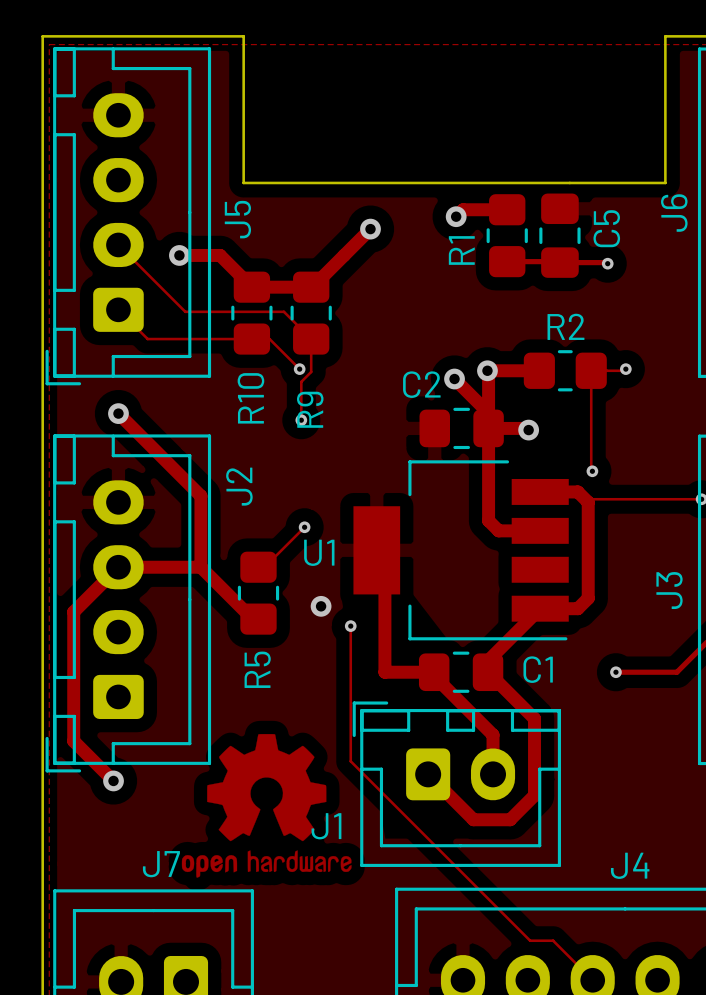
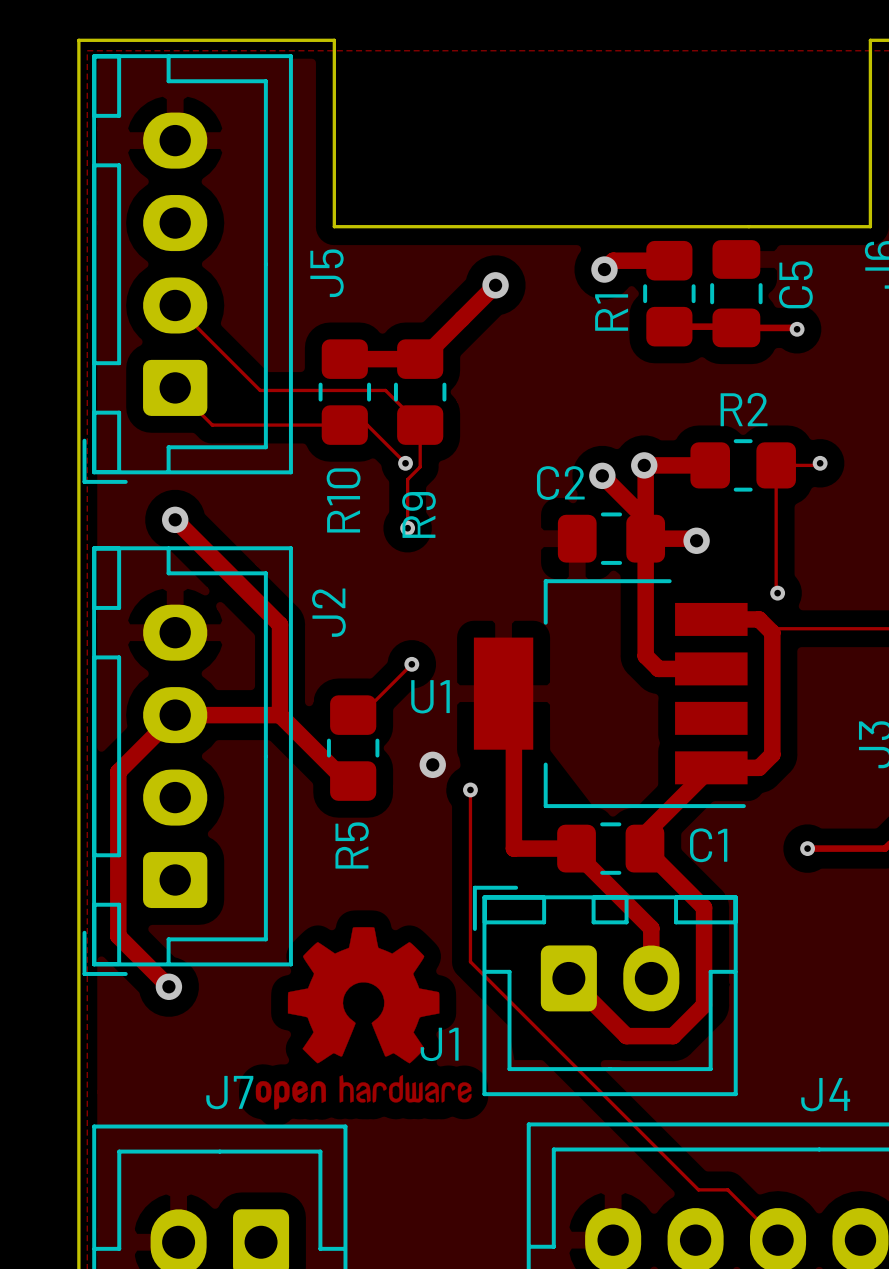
track: (179, 255) (220, 255) (251, 287) -> none
via: (179, 255) -> none

